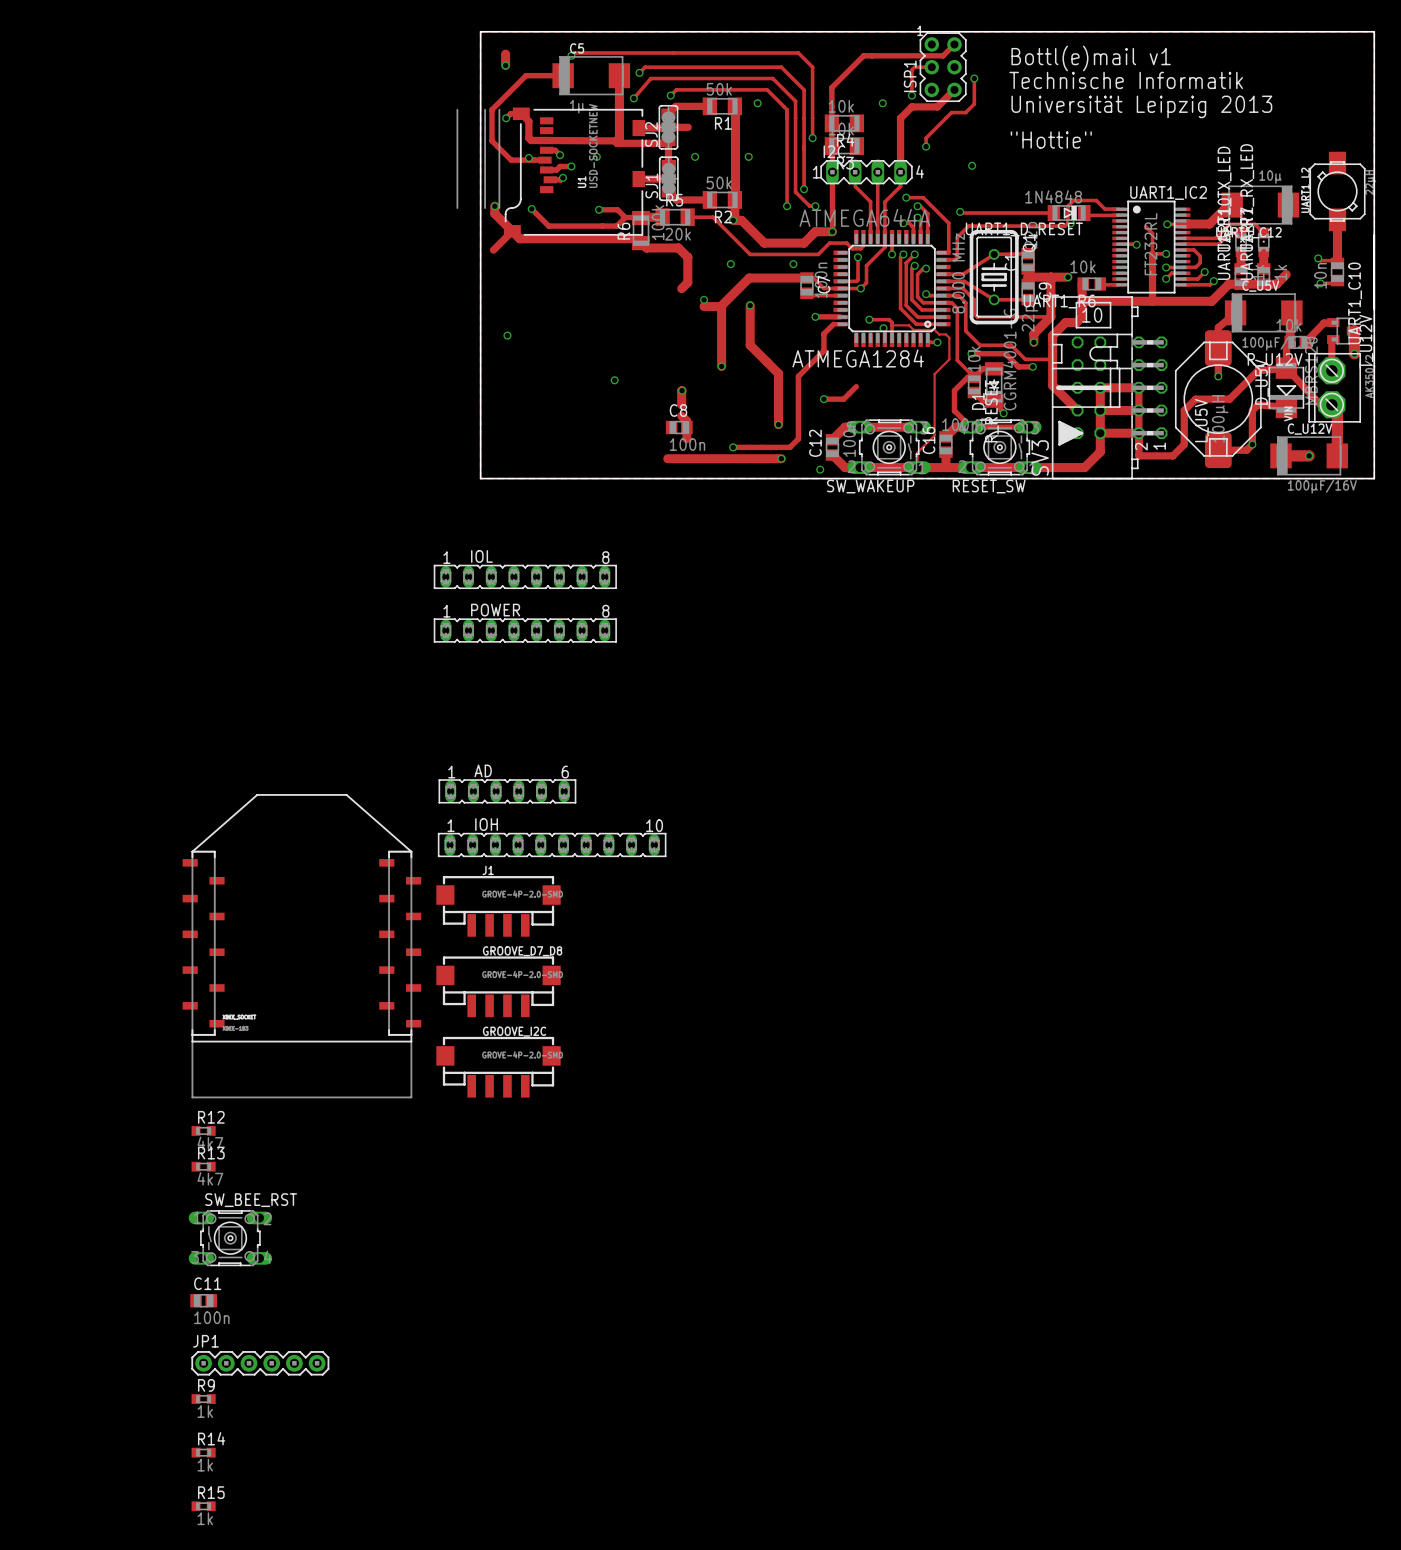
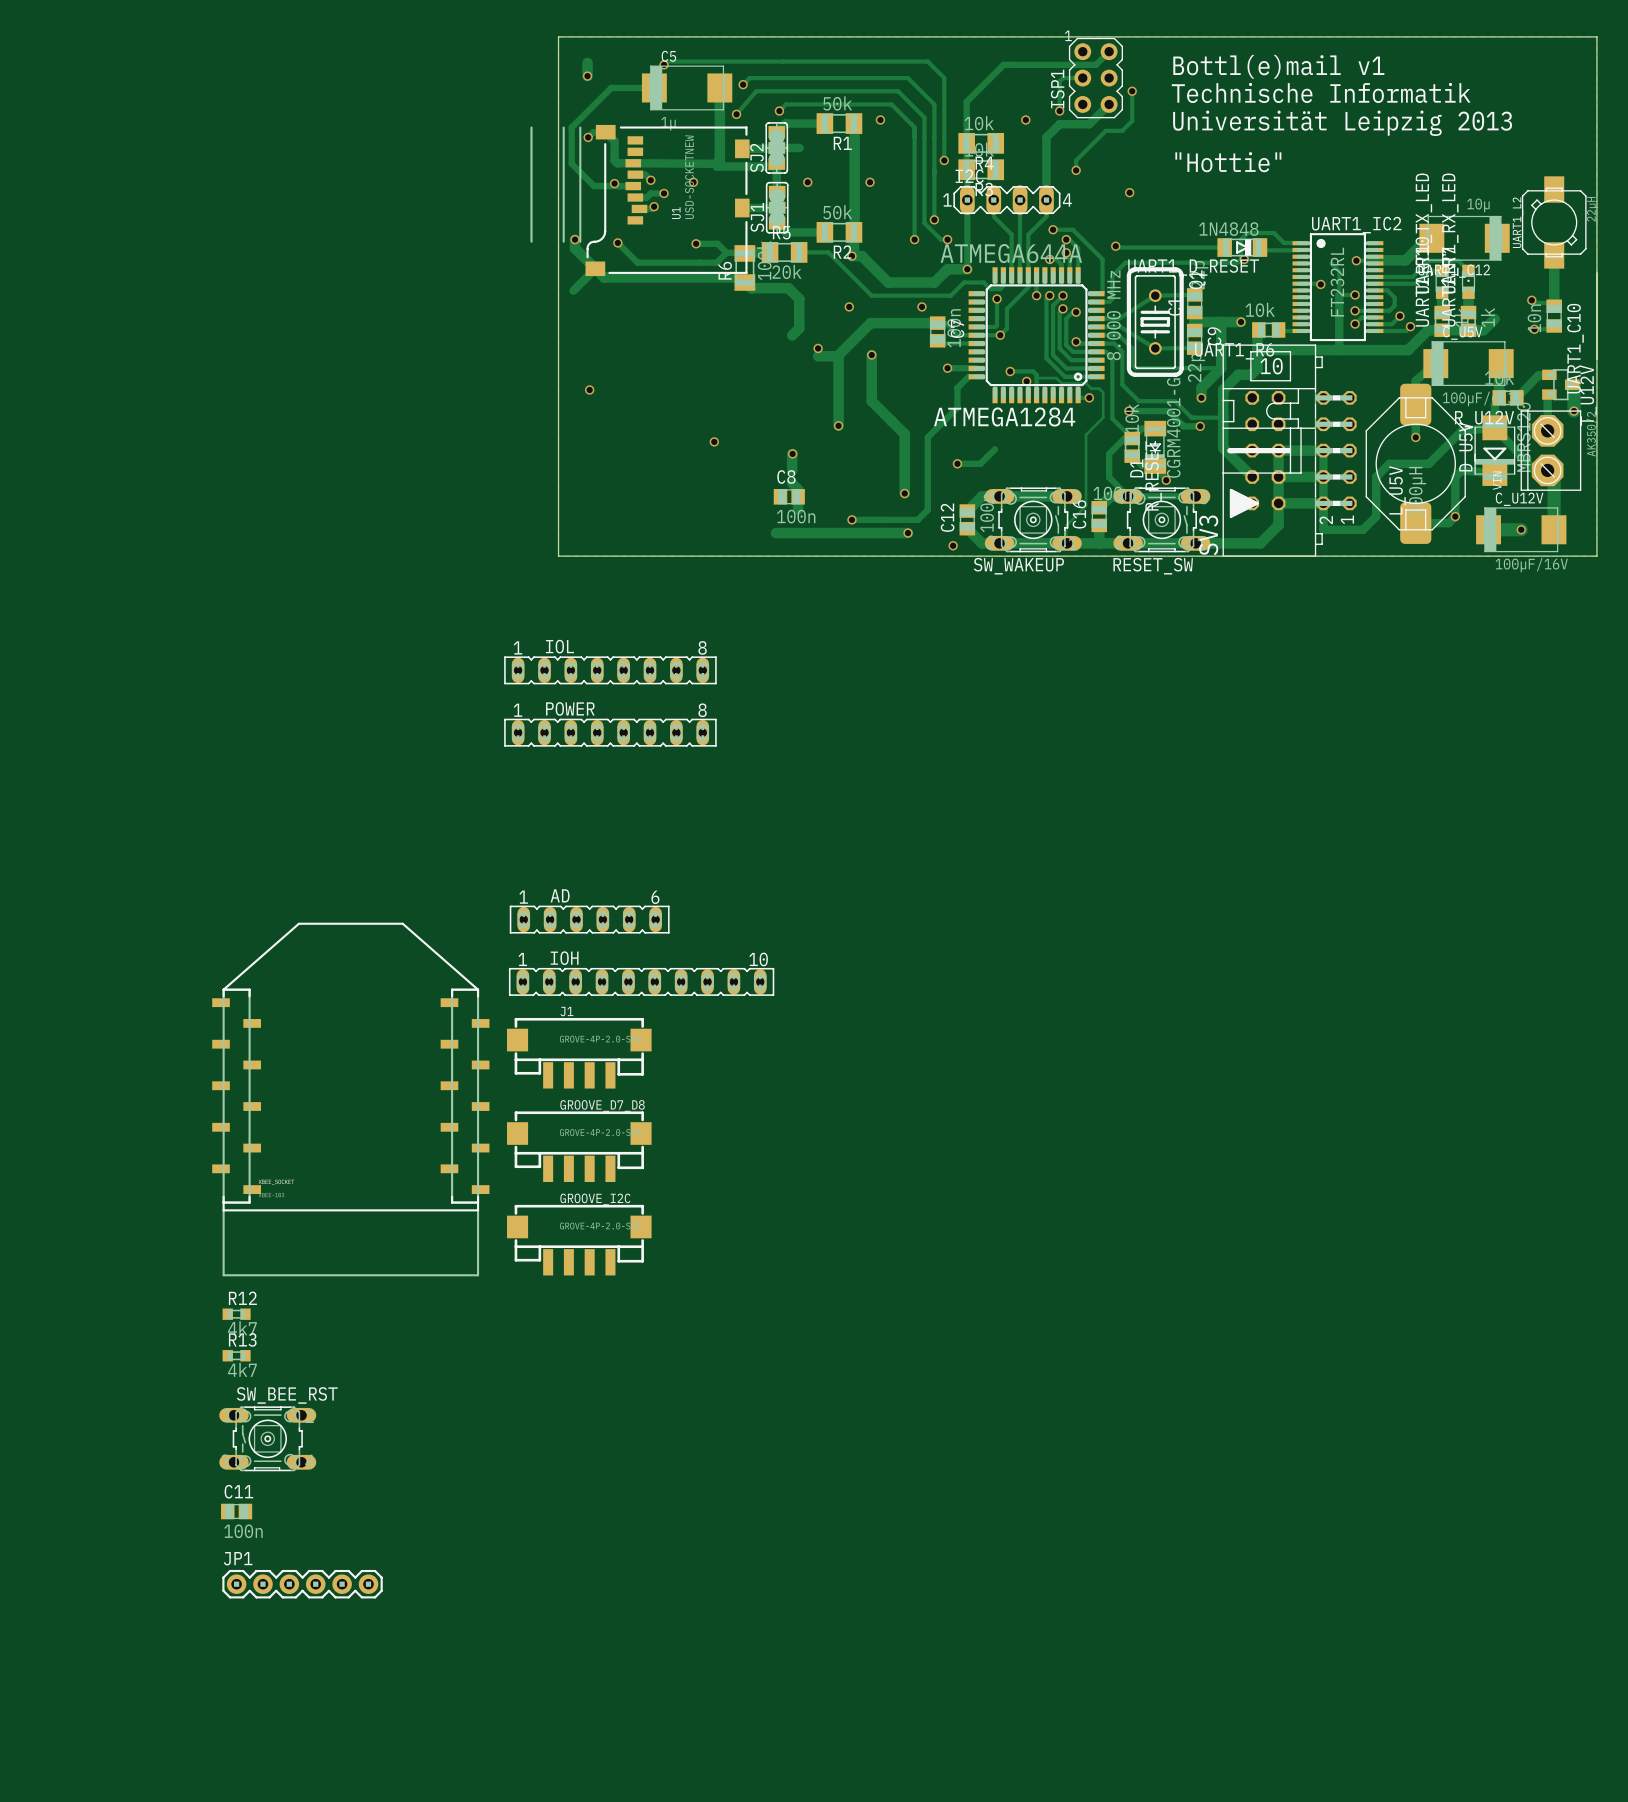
R9: 1k (203, 1399) -> none
R14: 1k (203, 1452) -> none
R15: 1k (203, 1506) -> none

